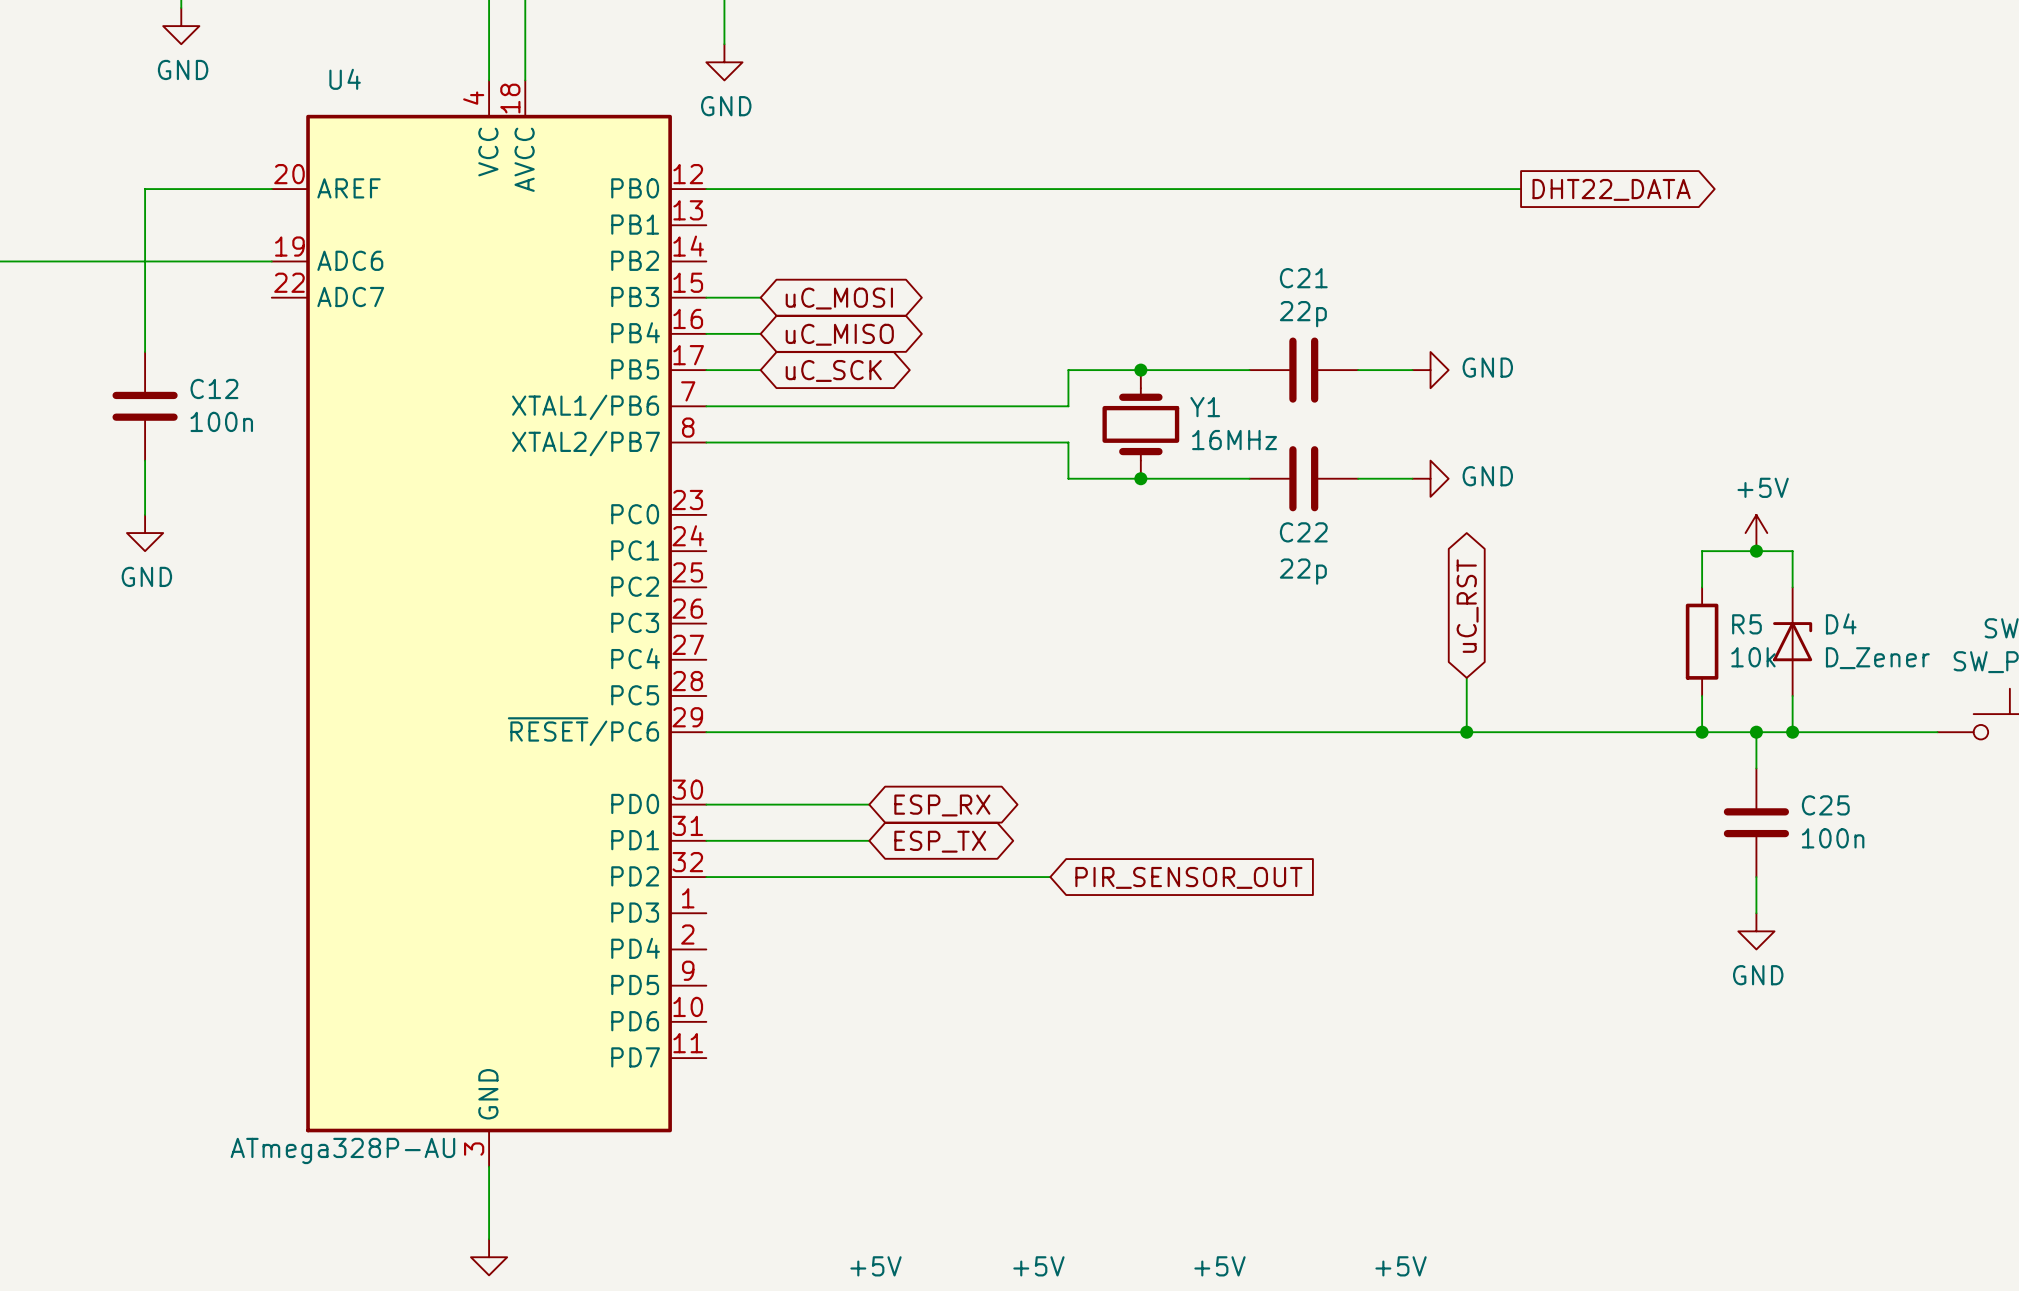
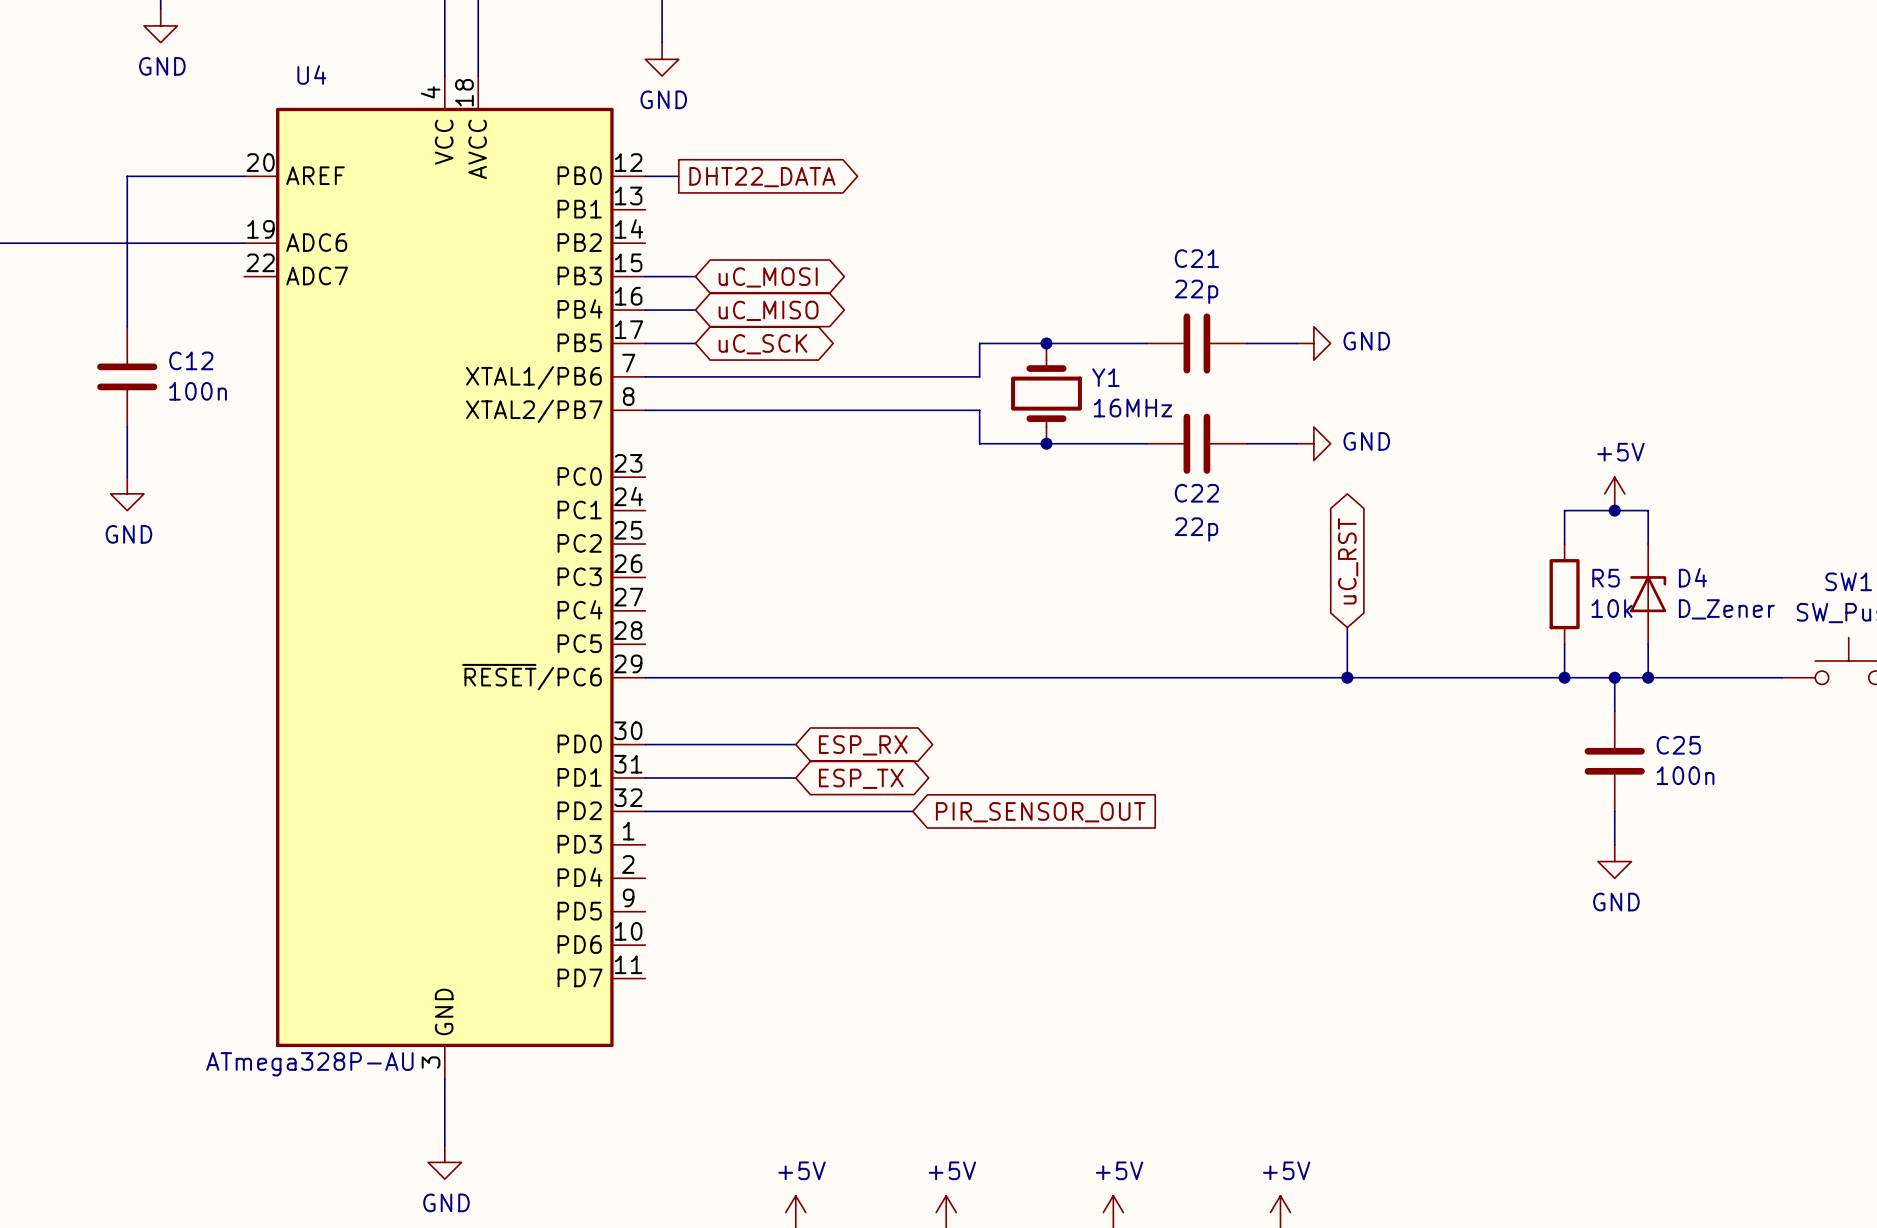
wire: (742, 189) (1521, 189) -> none
global label: none -> DHT22_DATA (762, 177)
global label: DHT22_DATA (1611, 189) -> none
wire: (996, 877) (1050, 877) -> none
global label position: PIR_SENSOR_OUT (1188, 877) -> PIR_SENSOR_OUT (1040, 812)

